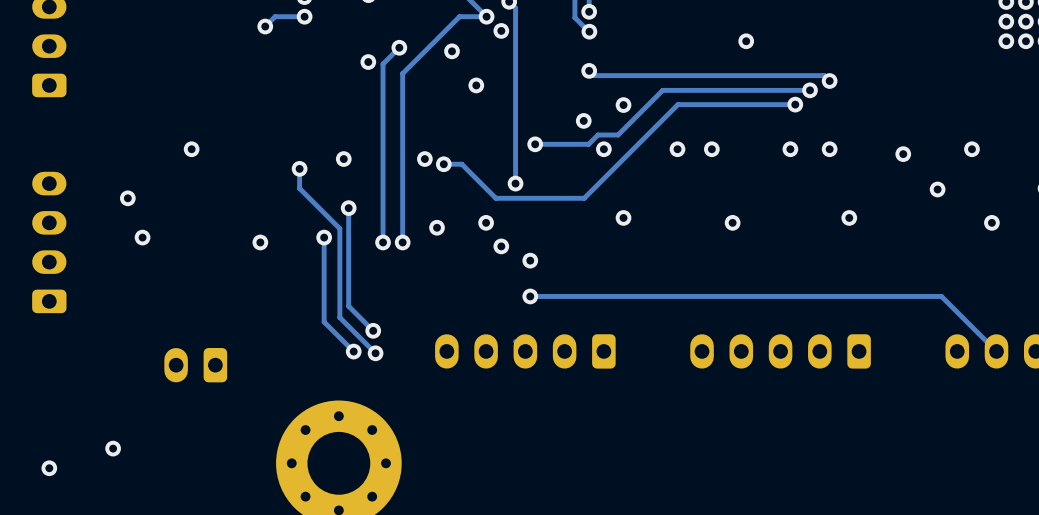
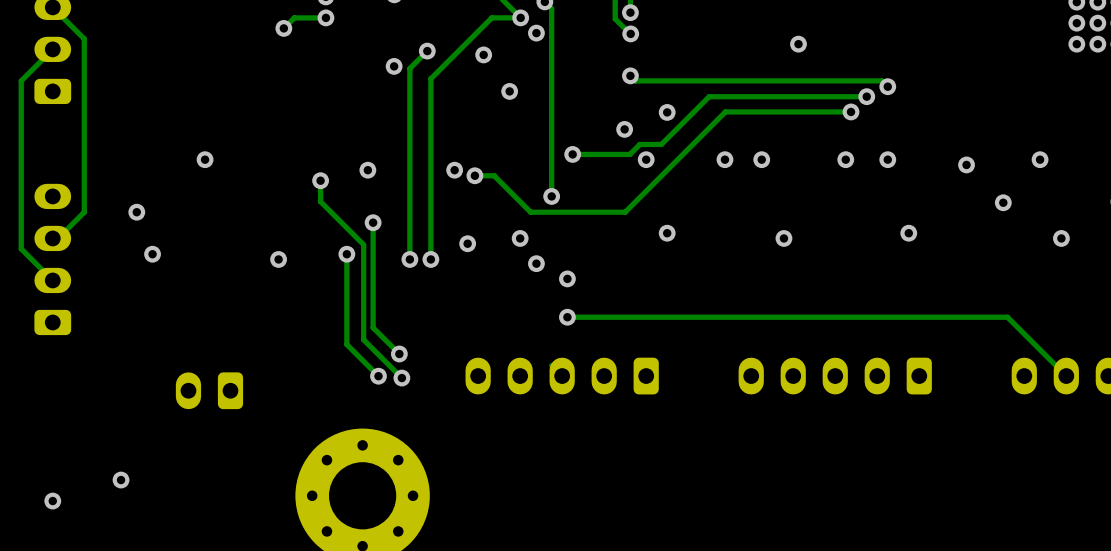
track: none -> (52, 7) (84, 38) (84, 212) (58, 238)
track: none -> (52, 49) (21, 80) (21, 248) (52, 280)

